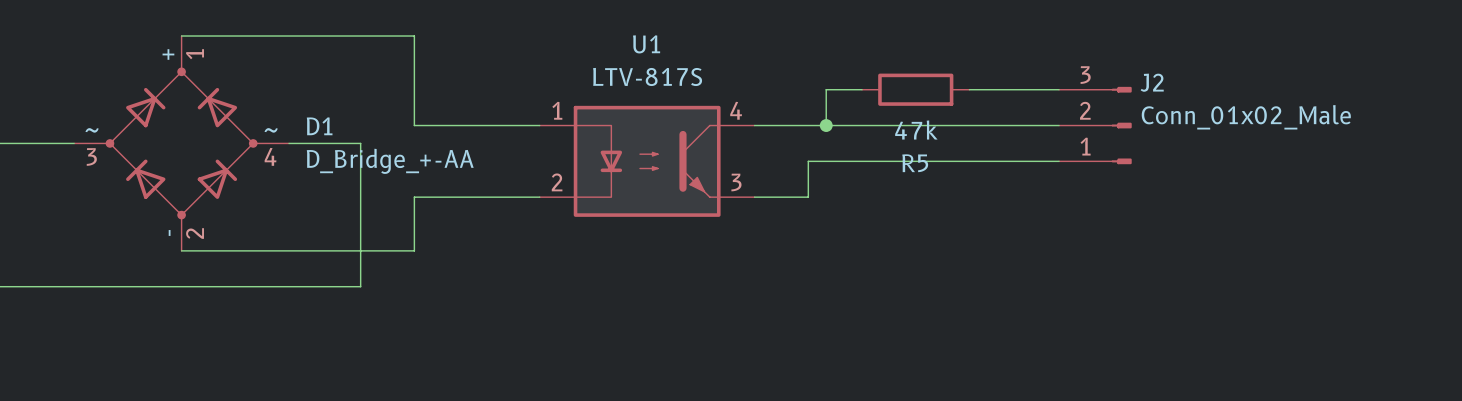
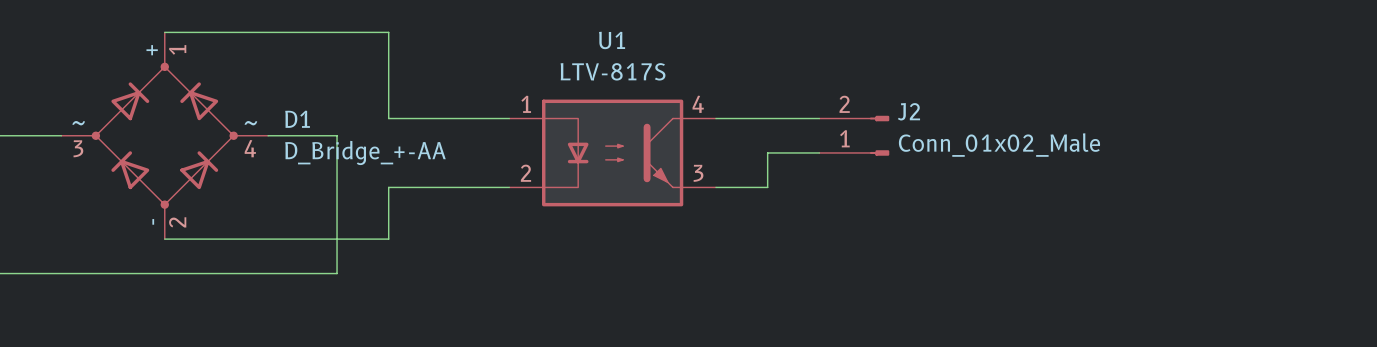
J2 symbol: [1059, 86, 1132, 165] -> [819, 115, 890, 156]
wire: (862, 89) (826, 89) (826, 125) -> none
R5: 47k (915, 89) -> none
wire: (969, 89) (1059, 89) -> none
junction: (826, 125) -> none
wire: (862, 125) (1059, 125) -> none
wire: (862, 161) (1059, 161) -> none

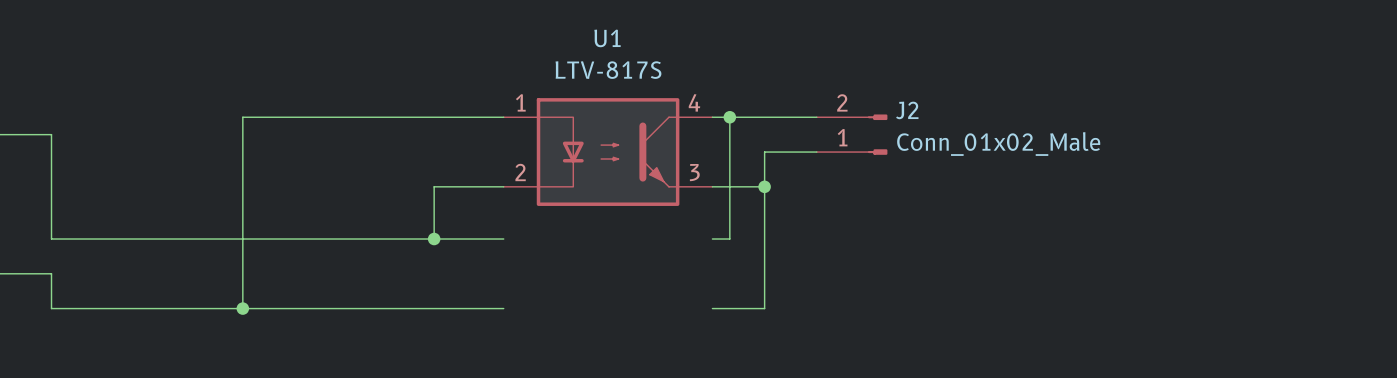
wire: (164, 32) (388, 32) (388, 118) -> (242, 308) (242, 117) (381, 117)
wire: none -> (729, 117) (729, 239) (712, 239)
junction: none -> (729, 117)
wire: none -> (51, 134) (51, 239) (155, 239)
D1: D_Bridge_+-AA (164, 135) -> none
wire: (268, 135) (337, 135) (337, 273) (61, 273) -> (503, 308) (51, 308) (51, 273)
wire: (440, 187) (388, 187) (388, 239) -> (434, 186) (434, 239)
wire: none -> (764, 186) (764, 308) (712, 308)
junction: none -> (764, 186)
wire: none -> (381, 239) (503, 239)
junction: none -> (434, 239)
junction: none -> (242, 308)

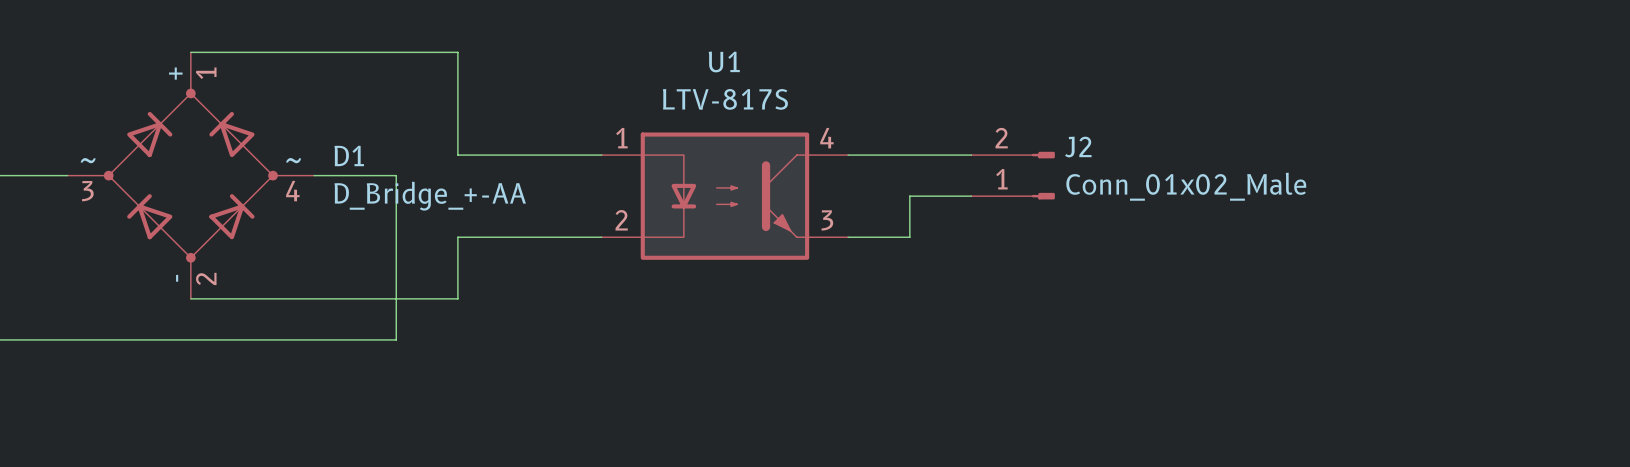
wire: (381, 117) (242, 117) (242, 308) -> (457, 155) (457, 52) (190, 52)
wire: (729, 117) (729, 239) (712, 239) -> none
junction: (729, 117) -> none
wire: (51, 134) (51, 239) (155, 239) -> none
D1: none -> D_Bridge_+-AA (190, 175)
wire: (434, 186) (434, 239) -> (519, 237) (457, 237) (457, 298)
wire: (764, 186) (764, 308) (712, 308) -> none
junction: (764, 186) -> none
wire: (381, 239) (503, 239) -> none
junction: (434, 239) -> none
wire: (51, 273) (51, 308) (503, 308) -> (67, 339) (396, 339) (396, 175) (314, 175)
junction: (242, 308) -> none

